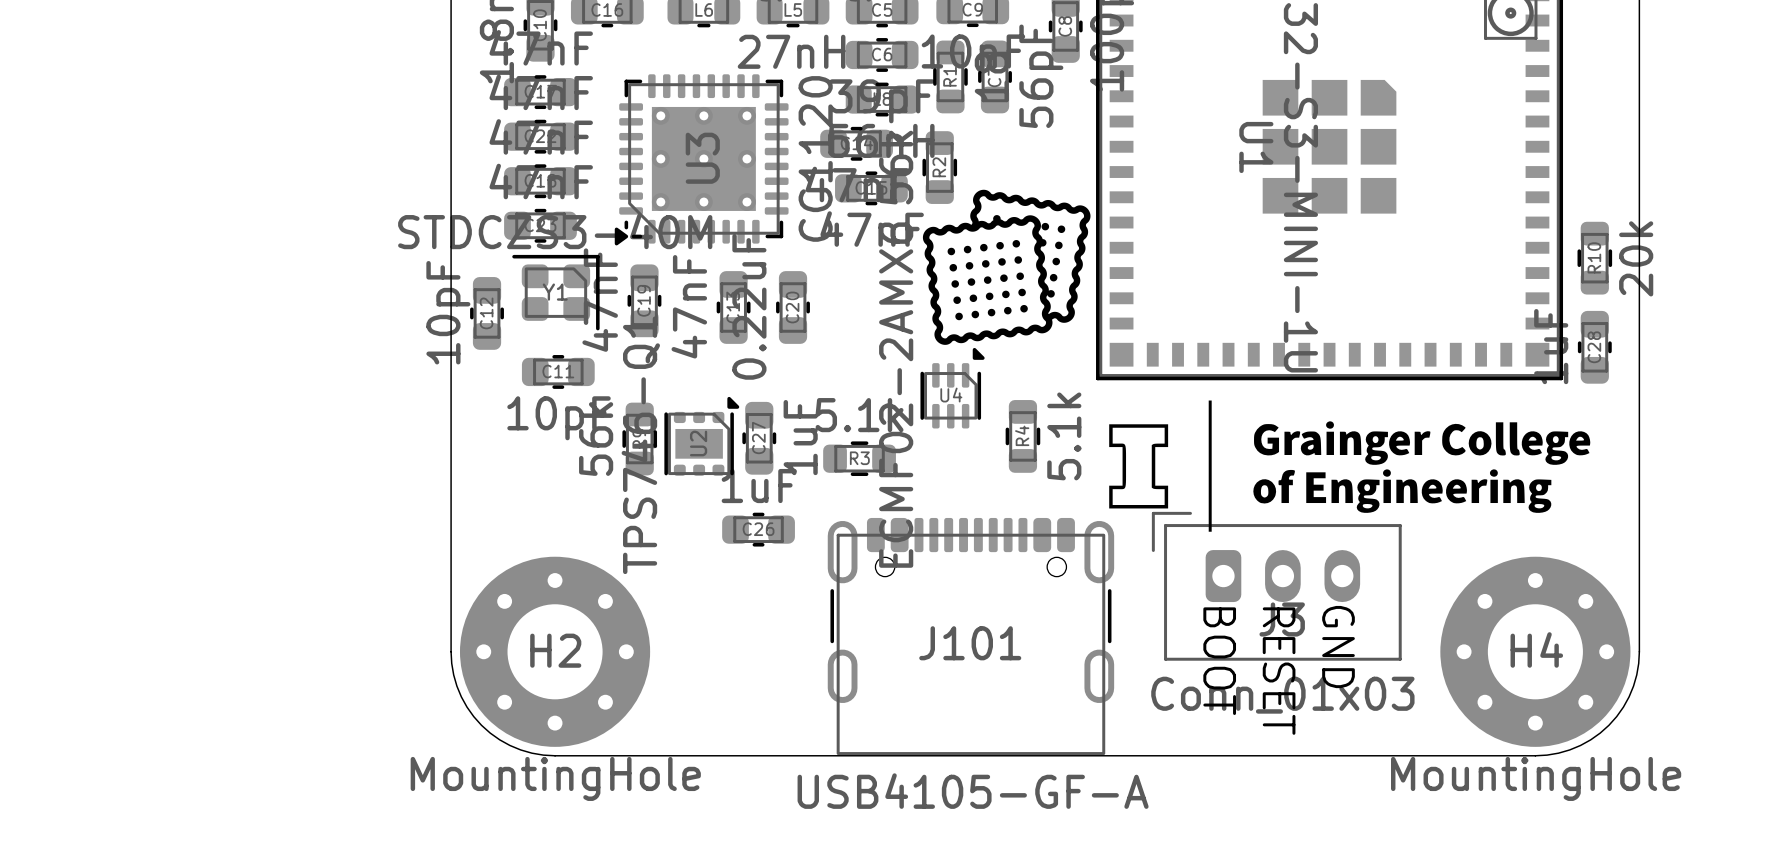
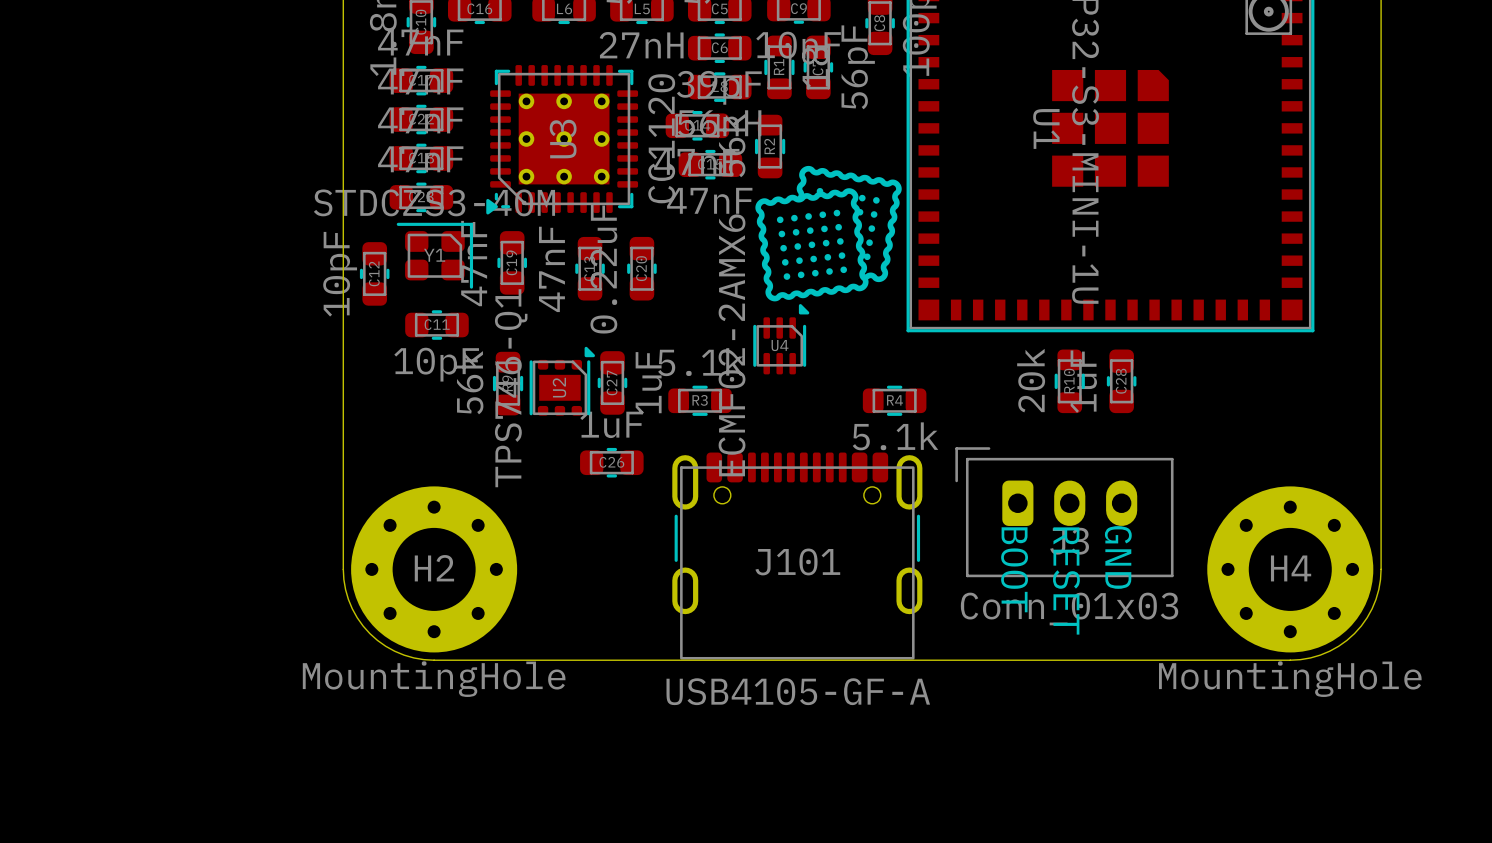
R10 position: (1594, 258) -> (1069, 381)
R10 value position: 20k (1636, 258) -> 20k (1031, 380)
C28 position: (1594, 347) -> (1121, 381)
drawing: [1109, 400, 1591, 532] -> none
R4 rotation: 0° (1022, 436) -> 90° clockwise (894, 400)
R4 position: (1022, 436) -> (894, 400)

